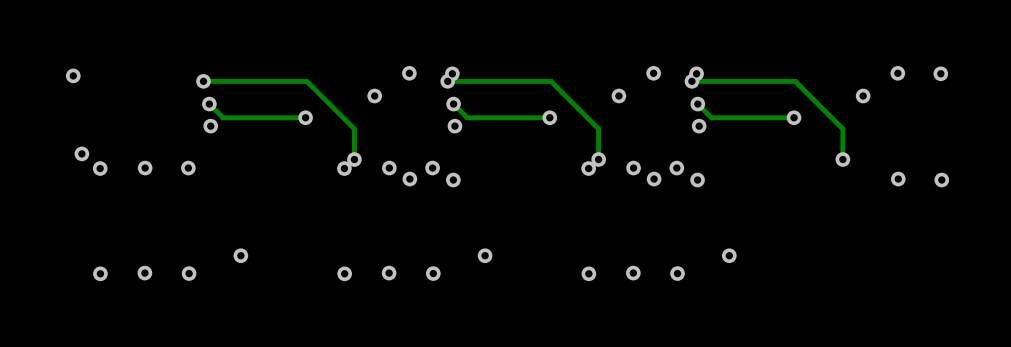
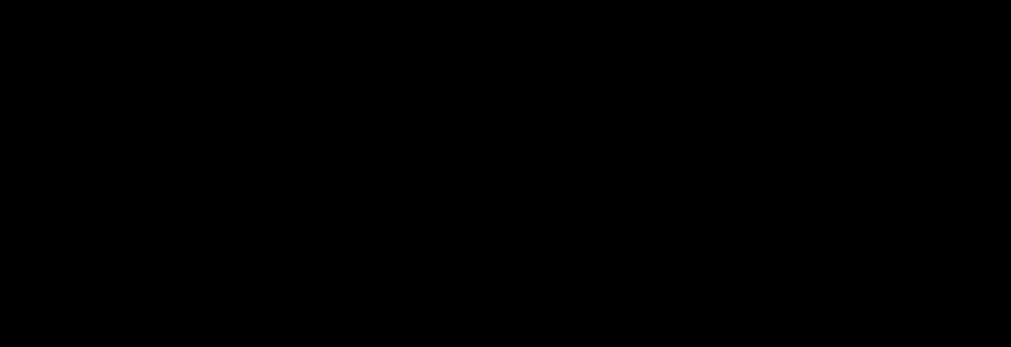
via: (409, 73) -> none
via: (452, 73) -> none
via: (653, 73) -> none
via: (696, 73) -> none
via: (897, 73) -> none
via: (940, 73) -> none
via: (73, 75) -> none
track: (203, 81) (306, 81) (354, 128) (354, 159) -> none
via: (203, 81) -> none
track: (447, 81) (551, 81) (598, 128) (598, 159) -> none
via: (447, 81) -> none
track: (691, 81) (795, 81) (842, 128) (842, 159) -> none
via: (691, 81) -> none
via: (374, 96) -> none
via: (618, 96) -> none
via: (863, 96) -> none
track: (209, 104) (223, 117) (305, 117) -> none
via: (209, 104) -> none
track: (453, 104) (467, 117) (549, 117) -> none
via: (453, 104) -> none
track: (697, 104) (711, 117) (794, 117) -> none
via: (697, 104) -> none
via: (305, 117) -> none
via: (549, 117) -> none
via: (794, 117) -> none
via: (210, 126) -> none
via: (454, 126) -> none
via: (699, 126) -> none
via: (81, 153) -> none
via: (354, 159) -> none
via: (598, 159) -> none
via: (842, 159) -> none
via: (100, 168) -> none
via: (145, 168) -> none
via: (188, 168) -> none
via: (344, 168) -> none
via: (389, 168) -> none
via: (432, 168) -> none
via: (588, 168) -> none
via: (633, 168) -> none
via: (676, 168) -> none
via: (409, 179) -> none
via: (654, 179) -> none
via: (898, 179) -> none
via: (453, 180) -> none
via: (697, 180) -> none
via: (941, 180) -> none
via: (240, 255) -> none
via: (485, 255) -> none
via: (729, 255) -> none
via: (100, 273) -> none
via: (144, 273) -> none
via: (189, 273) -> none
via: (344, 273) -> none
via: (389, 273) -> none
via: (433, 273) -> none
via: (588, 273) -> none
via: (633, 273) -> none
via: (677, 273) -> none

